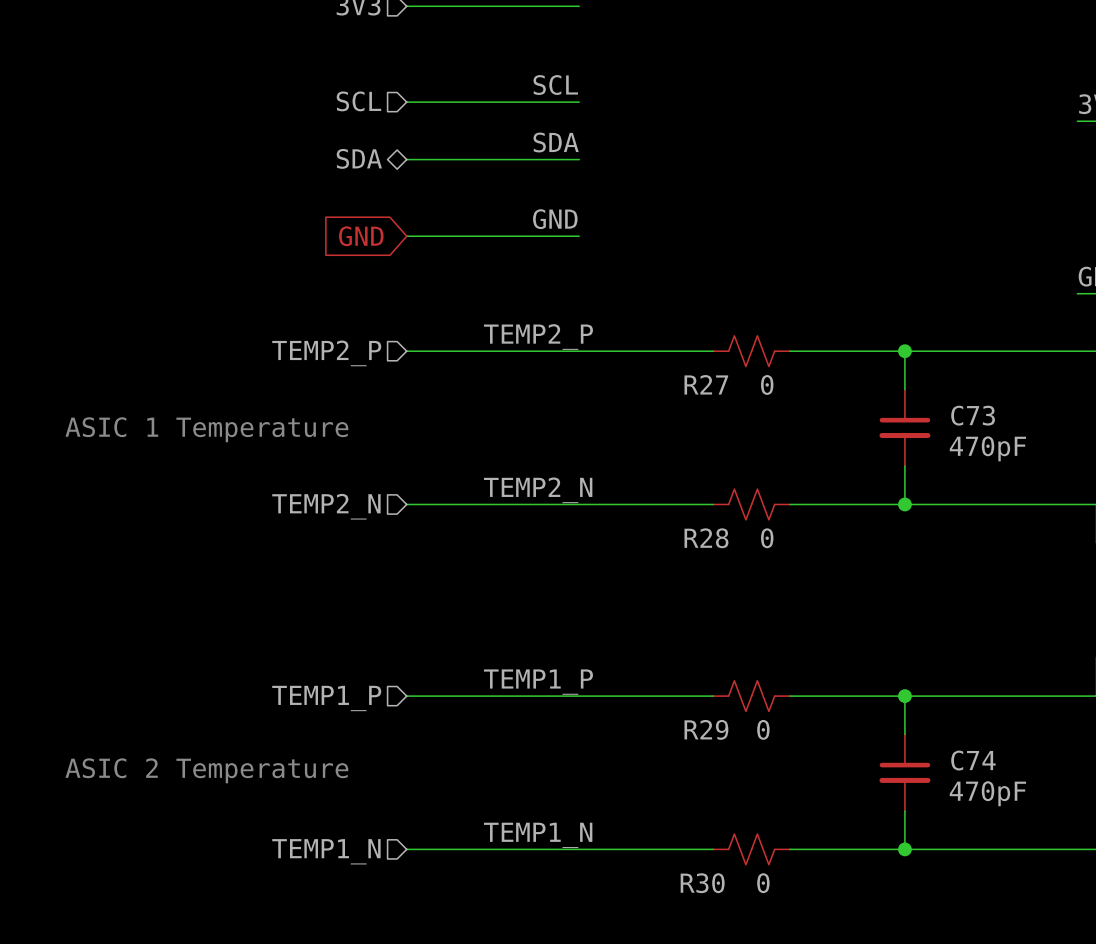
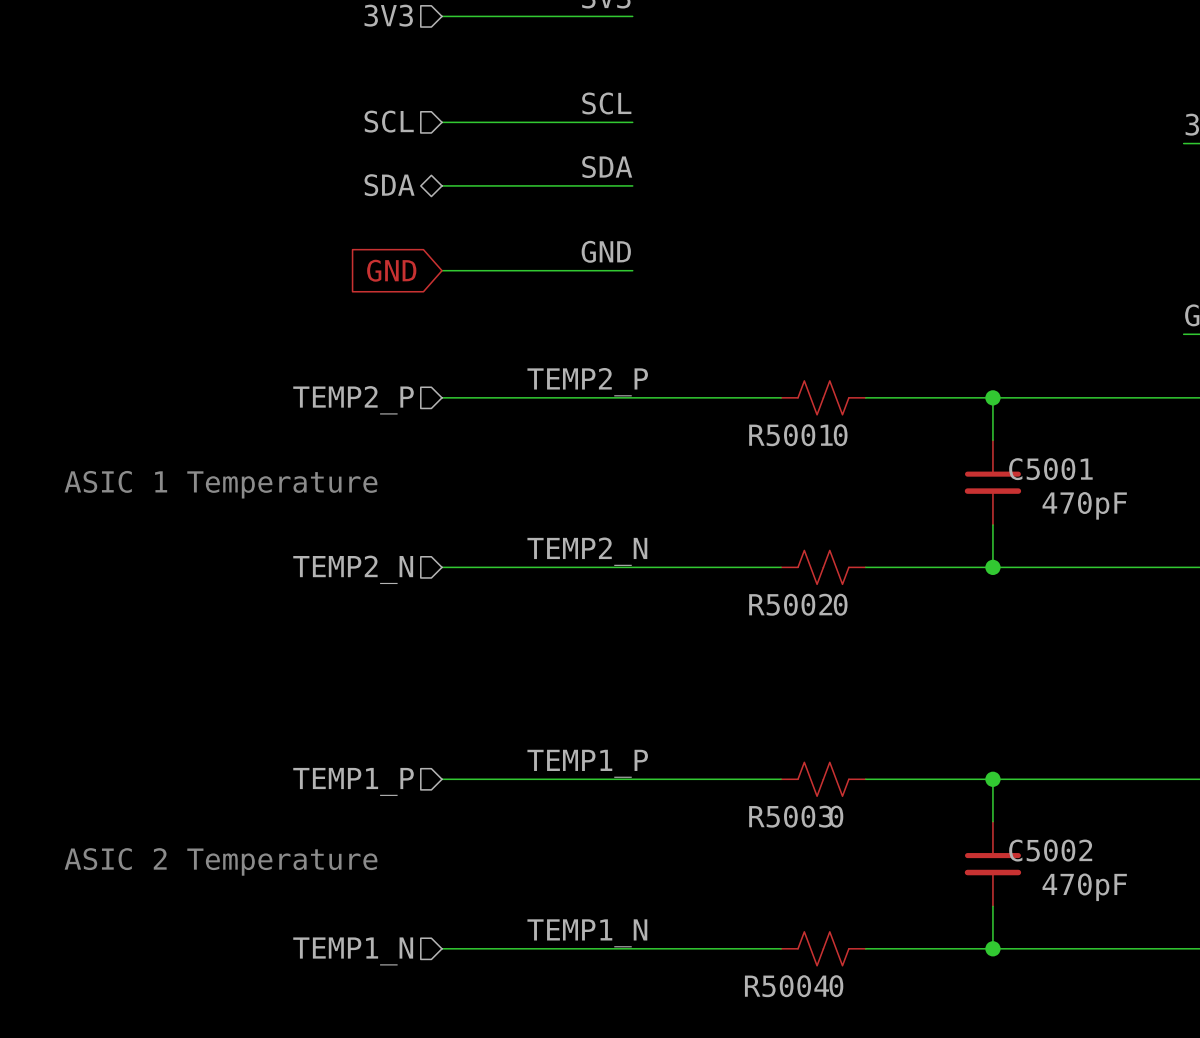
R27 name: R27 (706, 384) -> R5001 (790, 435)
C73 name: C73 (973, 415) -> C5001 (1050, 469)
R28 name: R28 (706, 538) -> R5002 (790, 604)
R29 name: R29 (706, 729) -> R5003 (790, 816)
C74 name: C74 (973, 760) -> C5002 (1050, 850)
R30 name: R30 (702, 883) -> R5004 (786, 986)

